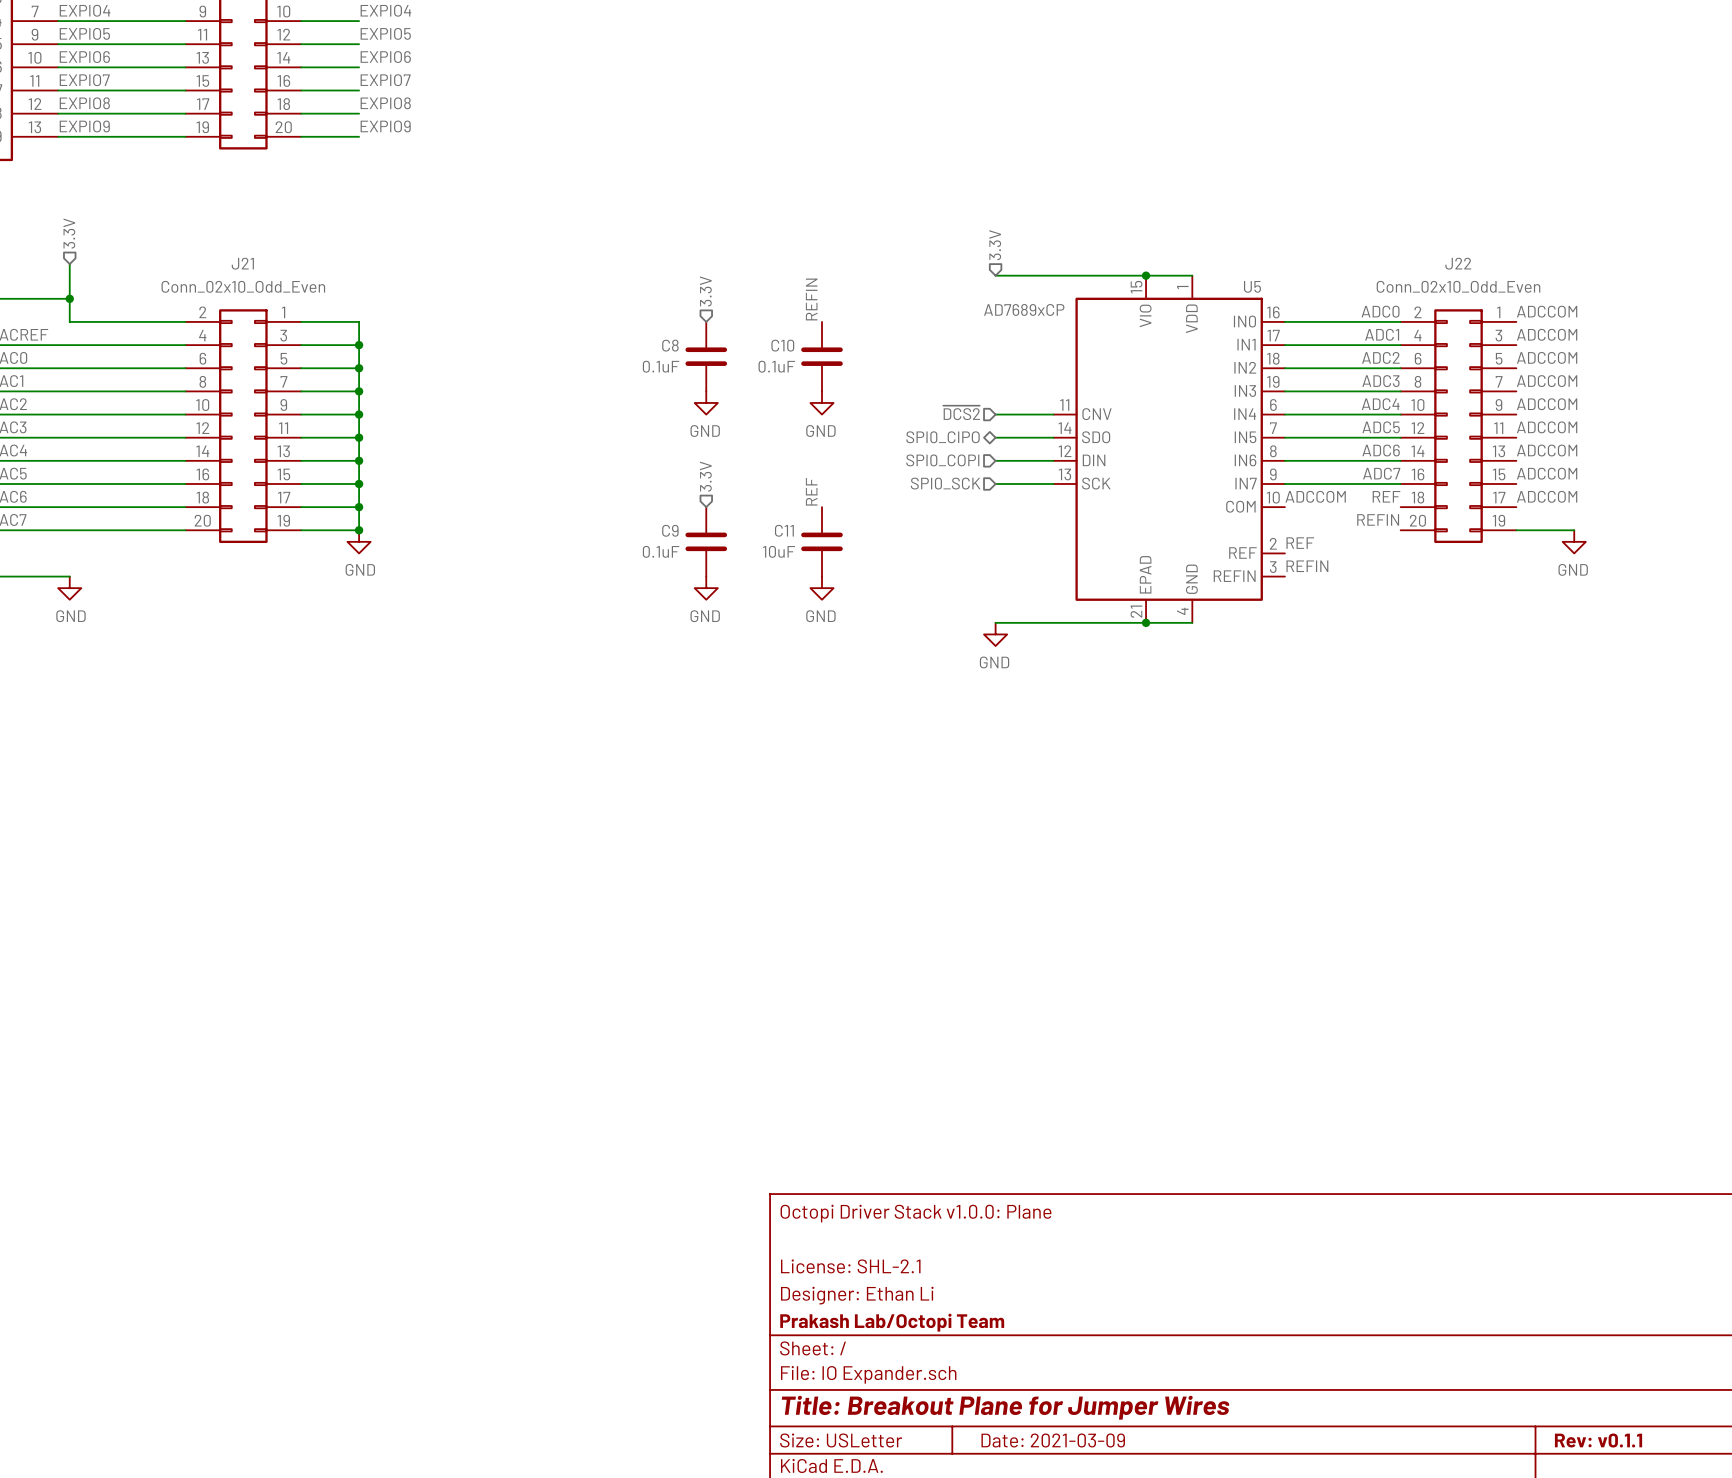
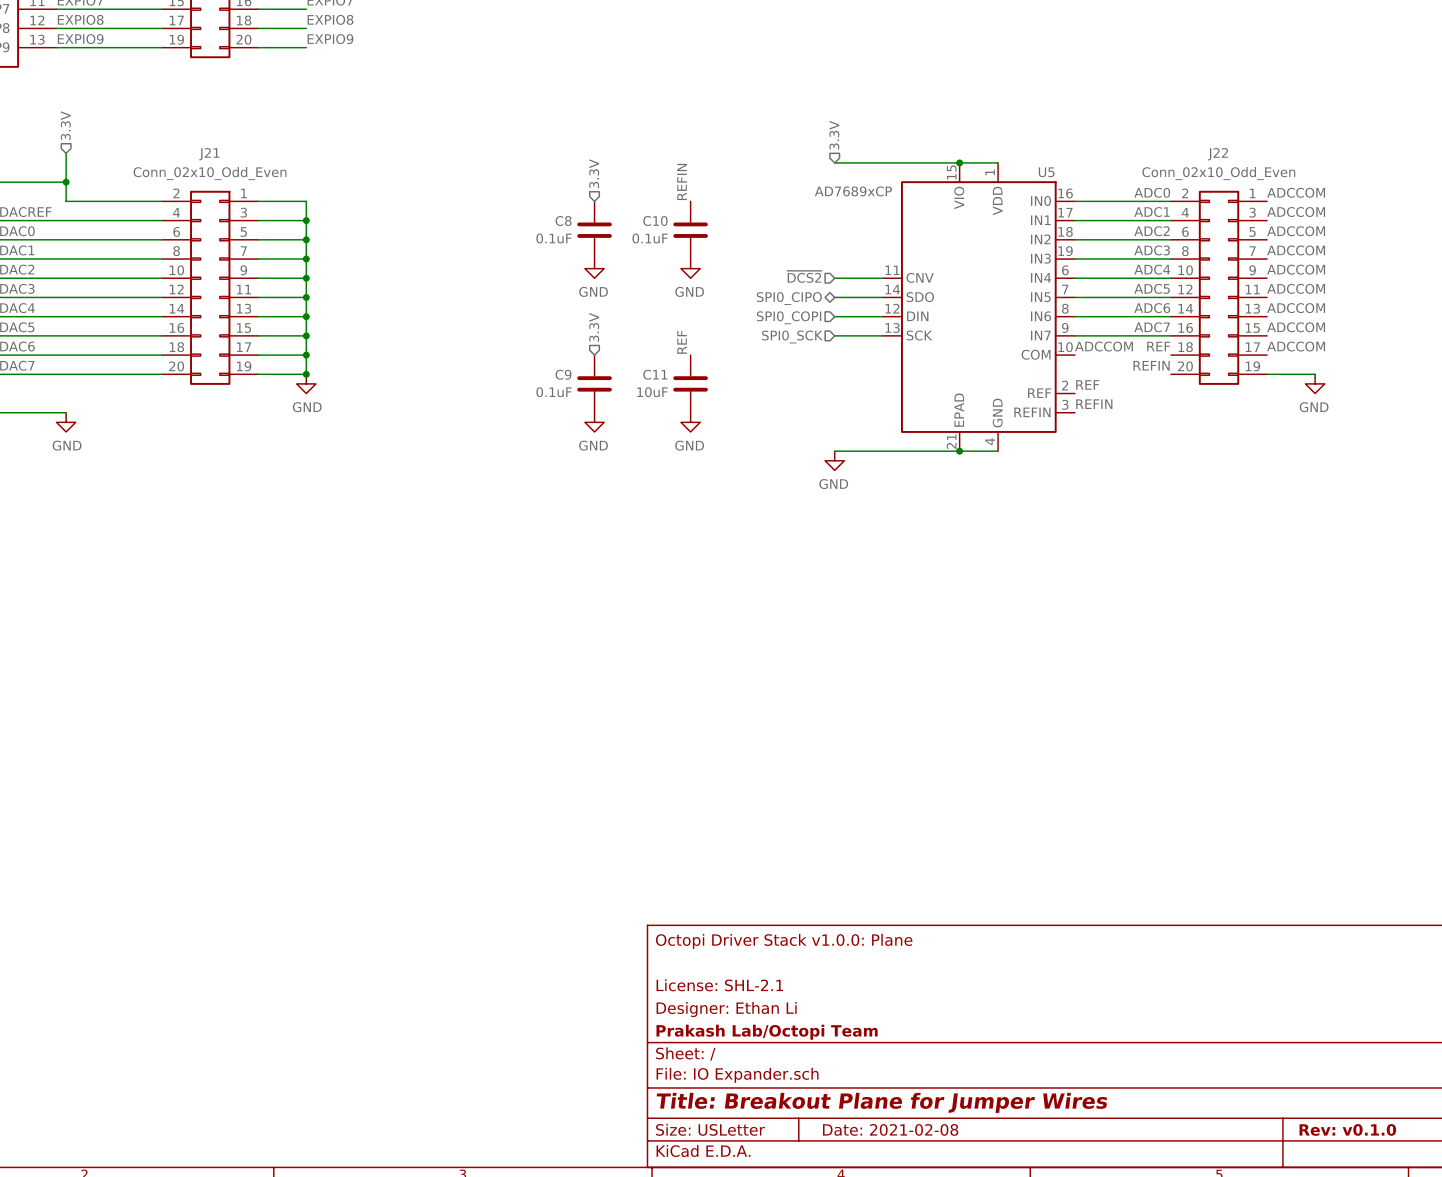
title block: Date: 2021-03-09 (1053, 1440) -> Date: 2021-02-08 (890, 1129)
title block: Rev: v0.1.1 (1598, 1440) -> Rev: v0.1.0 (1347, 1129)

